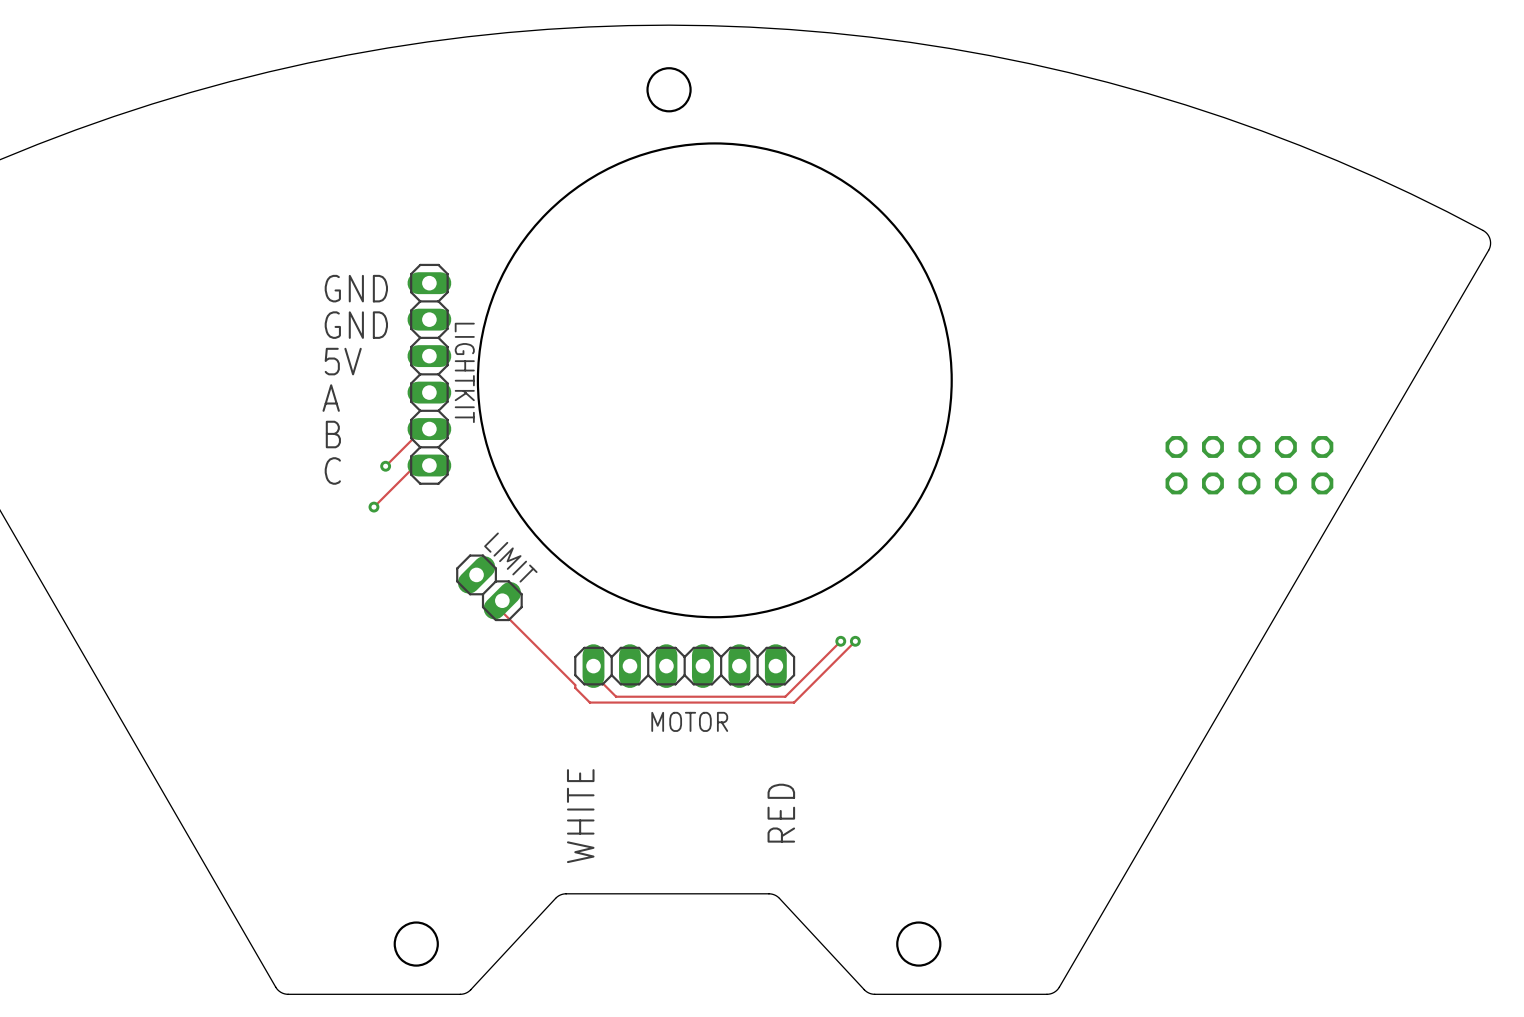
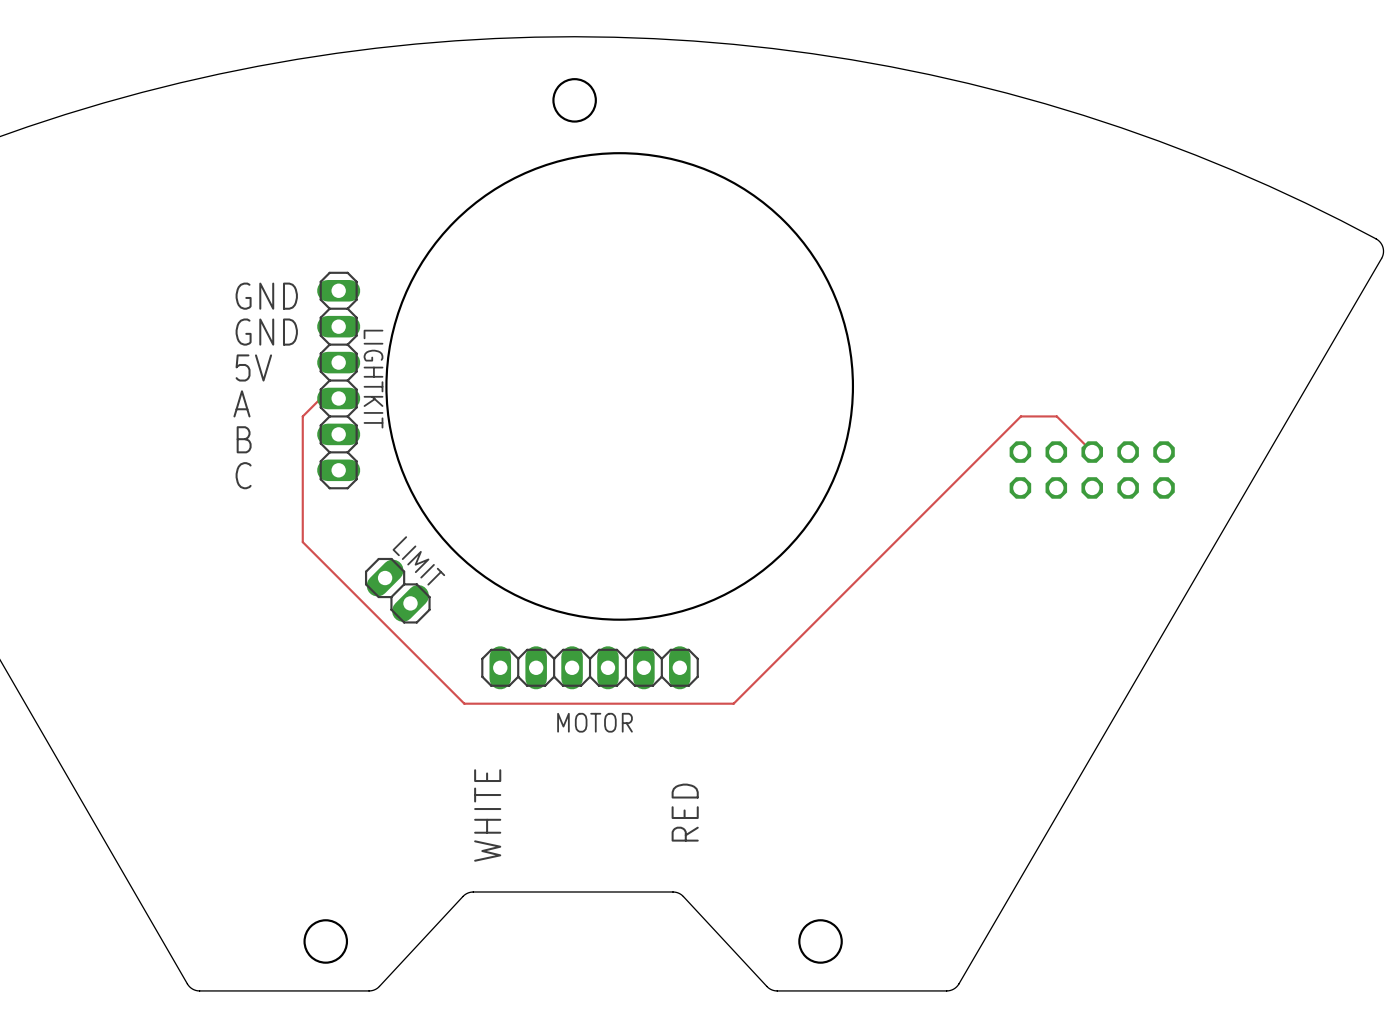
track: (429, 429) (429, 431) (420, 431) (385, 466) -> none
track: (429, 465) (414, 466) (373, 507) -> none
part position: (1249, 465) -> (1092, 470)
via: (385, 466) -> none
via: (373, 507) -> none
track: (502, 600) (502, 612) (575, 685) (575, 687) (589, 702) -> (338, 398) (320, 398) (302, 416) (302, 542) (464, 703) (496, 703)
track: (840, 641) (785, 696) (616, 696) (595, 676) (595, 667) (593, 666) -> none
via: (840, 641) -> none
track: (855, 641) (794, 702) -> (1092, 451) (1056, 416) (1020, 416) (733, 703) (697, 703)
via: (855, 641) -> none

